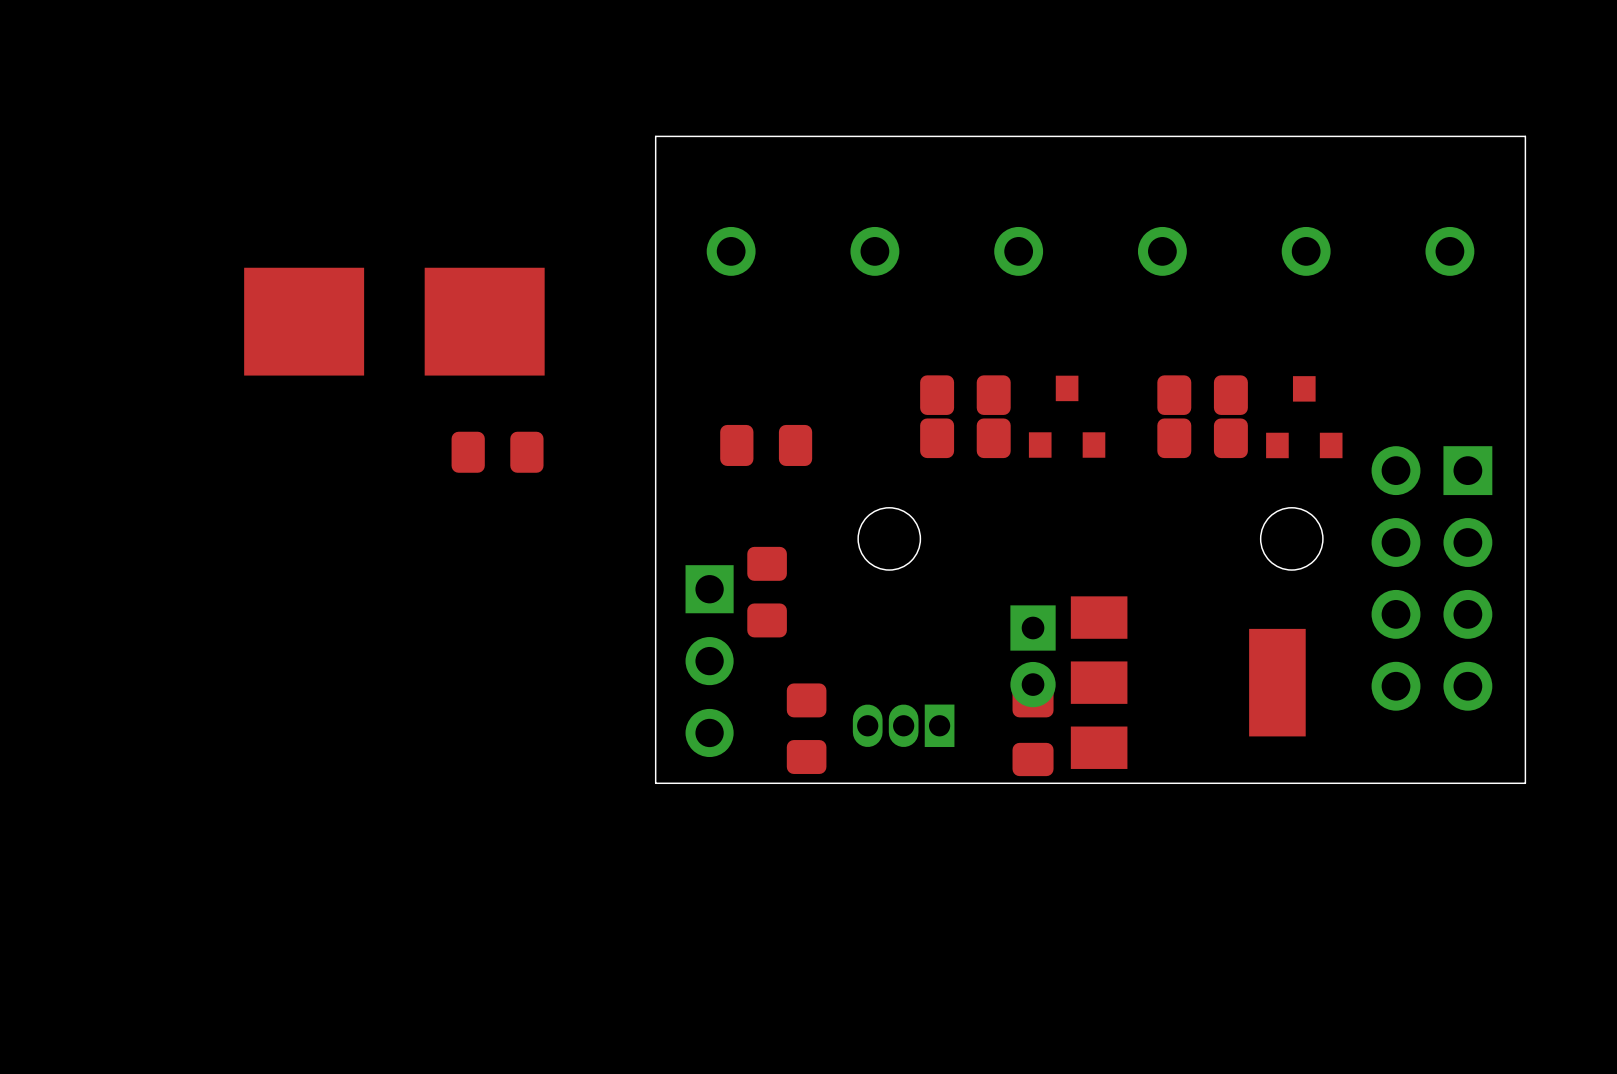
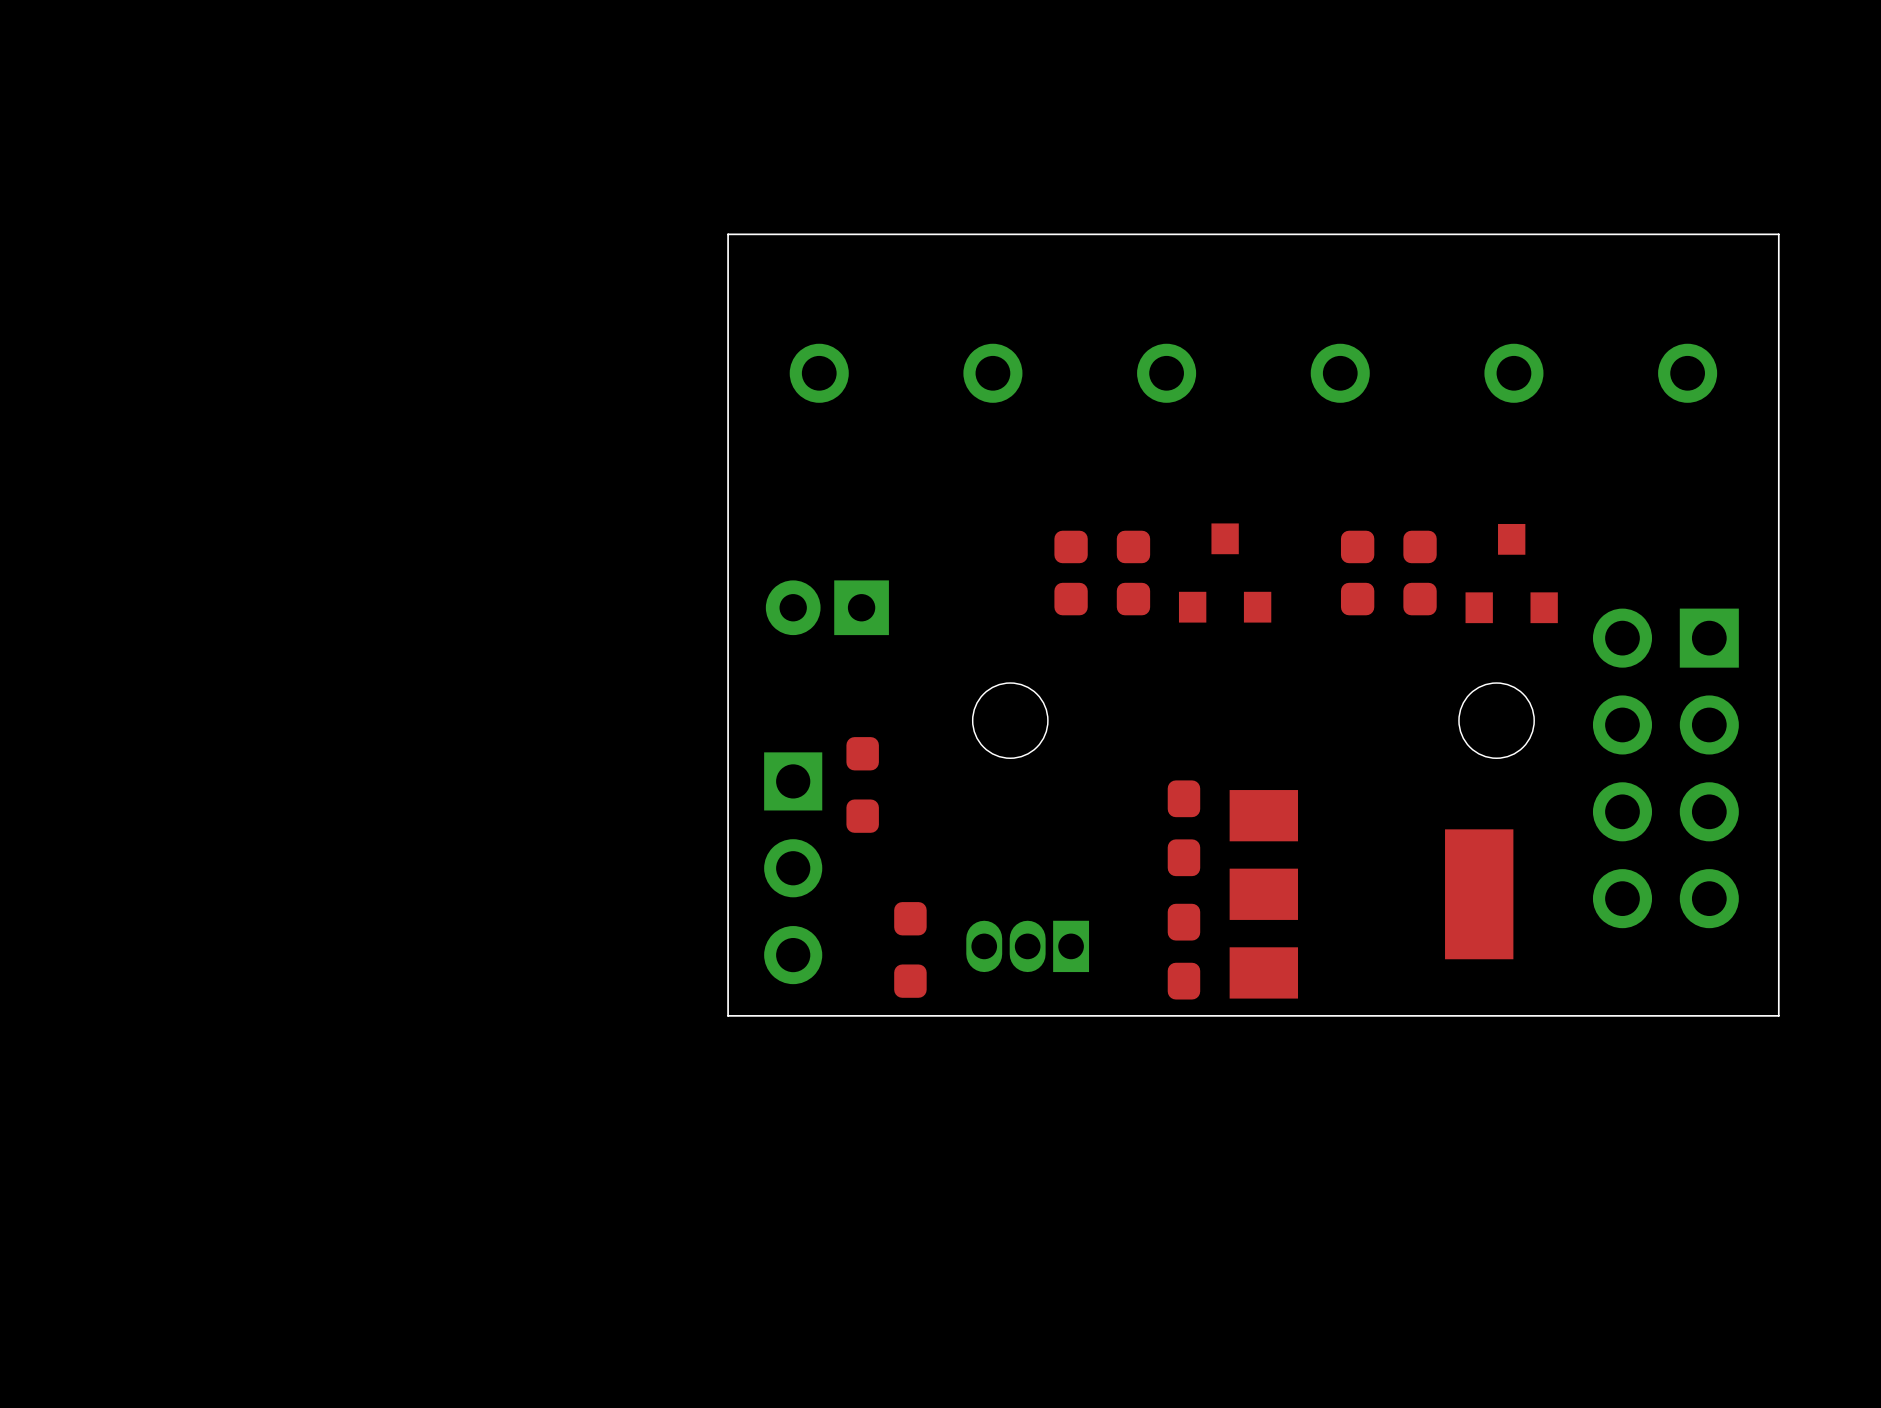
part: (394, 321) -> none
part footprint: [920, 375, 1011, 415] -> [1054, 530, 1151, 564]
part footprint: [1157, 375, 1248, 415] -> [1340, 530, 1437, 564]
part footprint: [920, 418, 1011, 459] -> [1054, 582, 1151, 616]
part footprint: [1157, 418, 1248, 459] -> [1340, 582, 1437, 616]
part footprint: [720, 424, 813, 466] -> [765, 580, 889, 636]
part: (497, 452) -> none
part footprint: [747, 546, 787, 638] -> [846, 737, 879, 833]
part footprint: [1010, 605, 1056, 708] -> [1167, 780, 1201, 877]
part footprint: [786, 683, 827, 774] -> [894, 902, 927, 998]
part footprint: [1012, 684, 1054, 777] -> [1167, 903, 1201, 1000]

